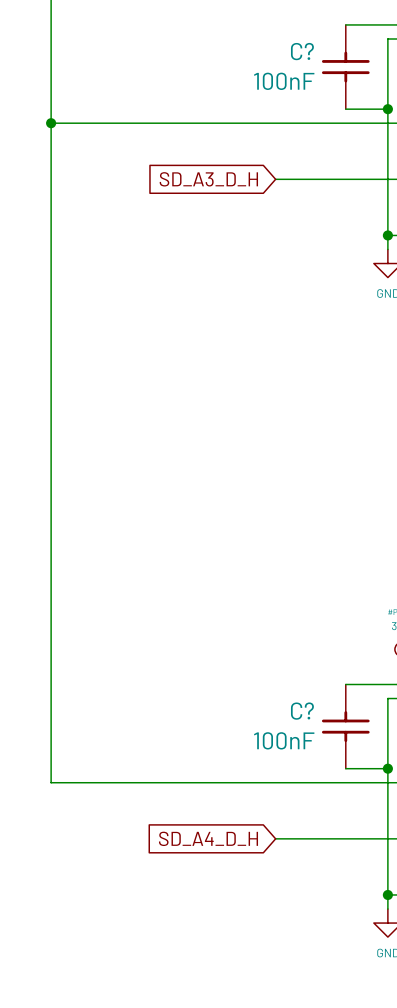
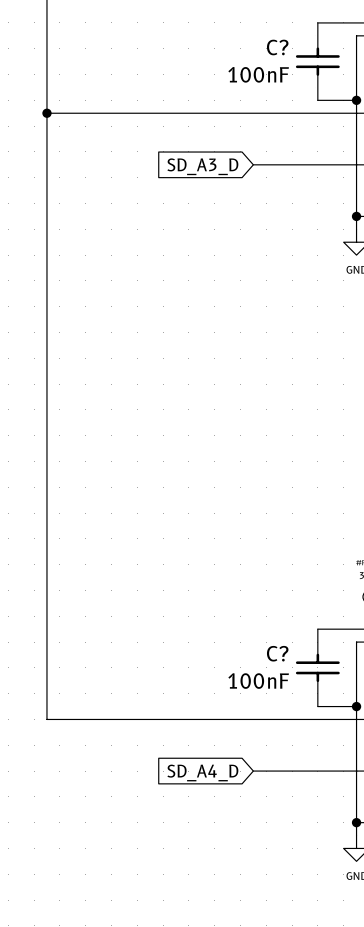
global label: SD_A3_D_H (208, 179) -> SD_A3_D (202, 166)
global label: SD_A4_D_H (208, 838) -> SD_A4_D (202, 772)

